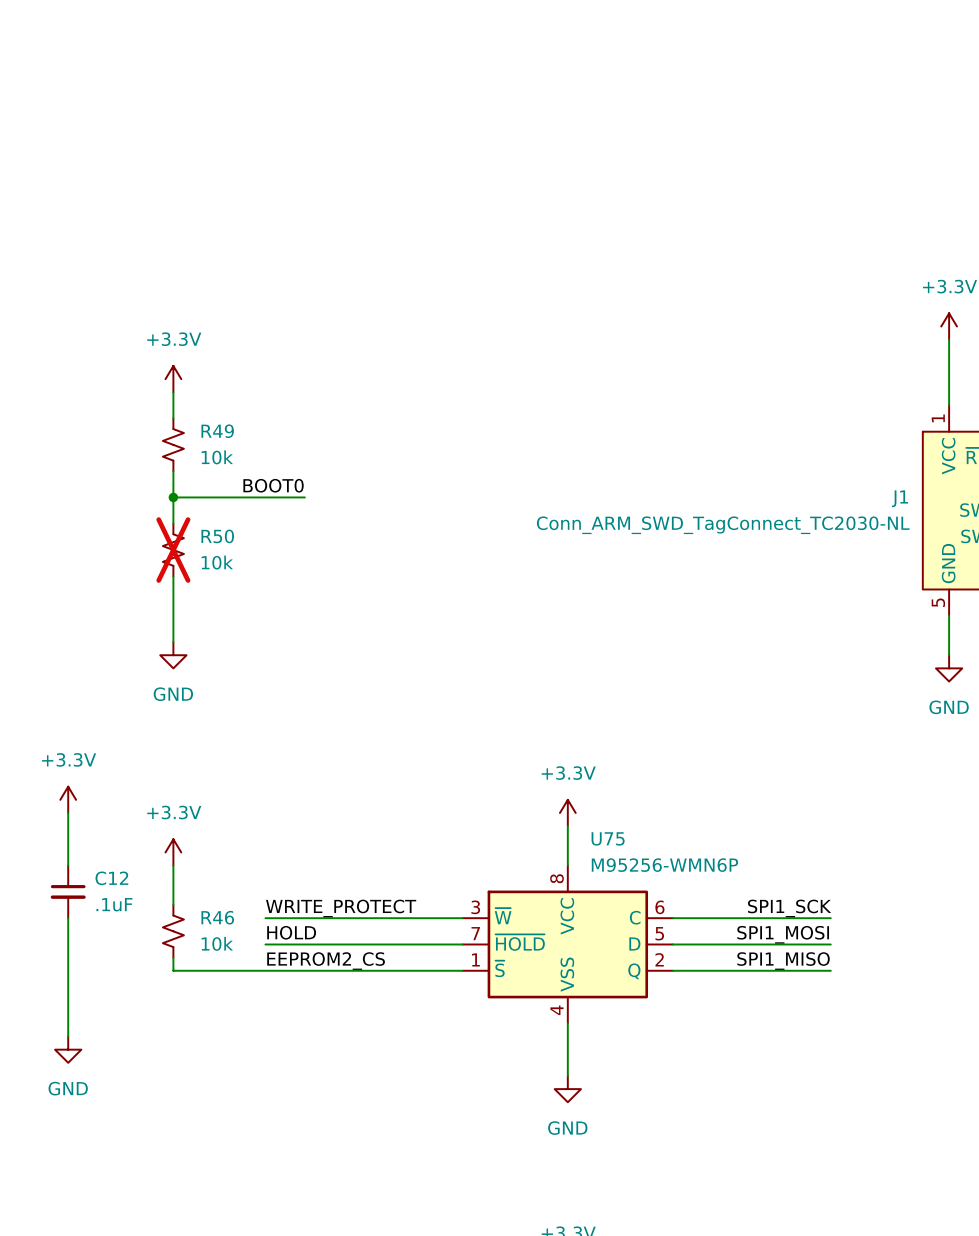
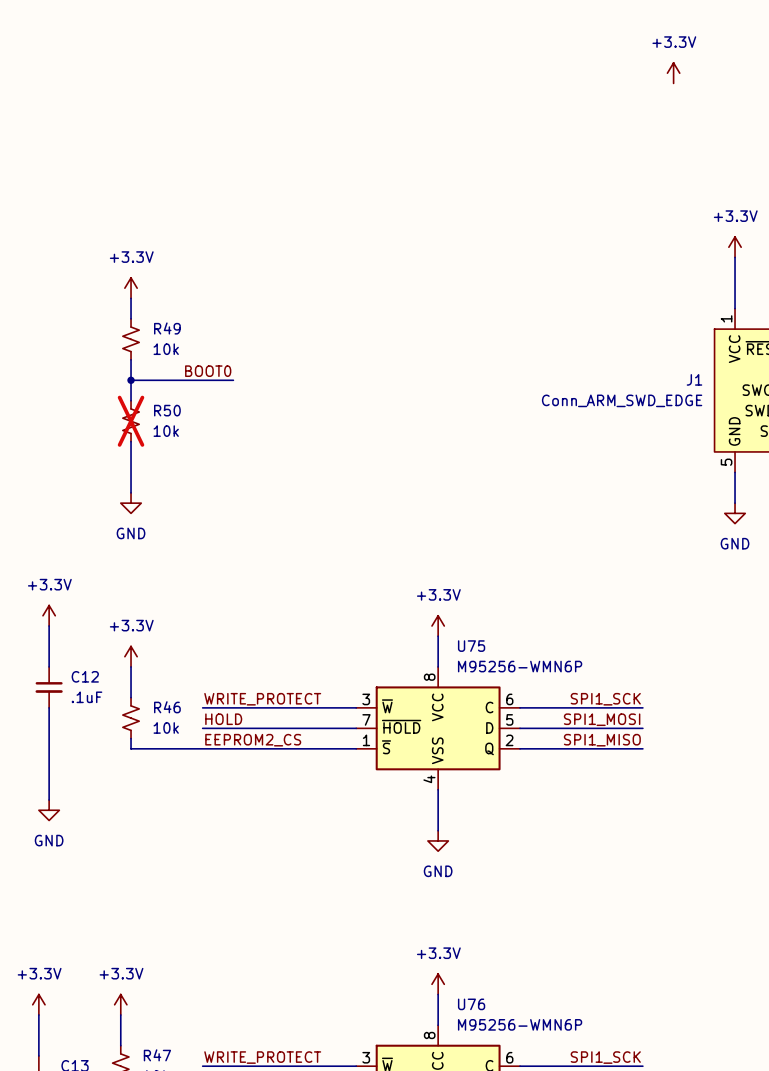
power symbol: none -> +3.3V (673, 73)
J1 value: Conn_ARM_SWD_TagConnect_TC2030-NL (723, 525) -> Conn_ARM_SWD_EDGE (622, 400)

